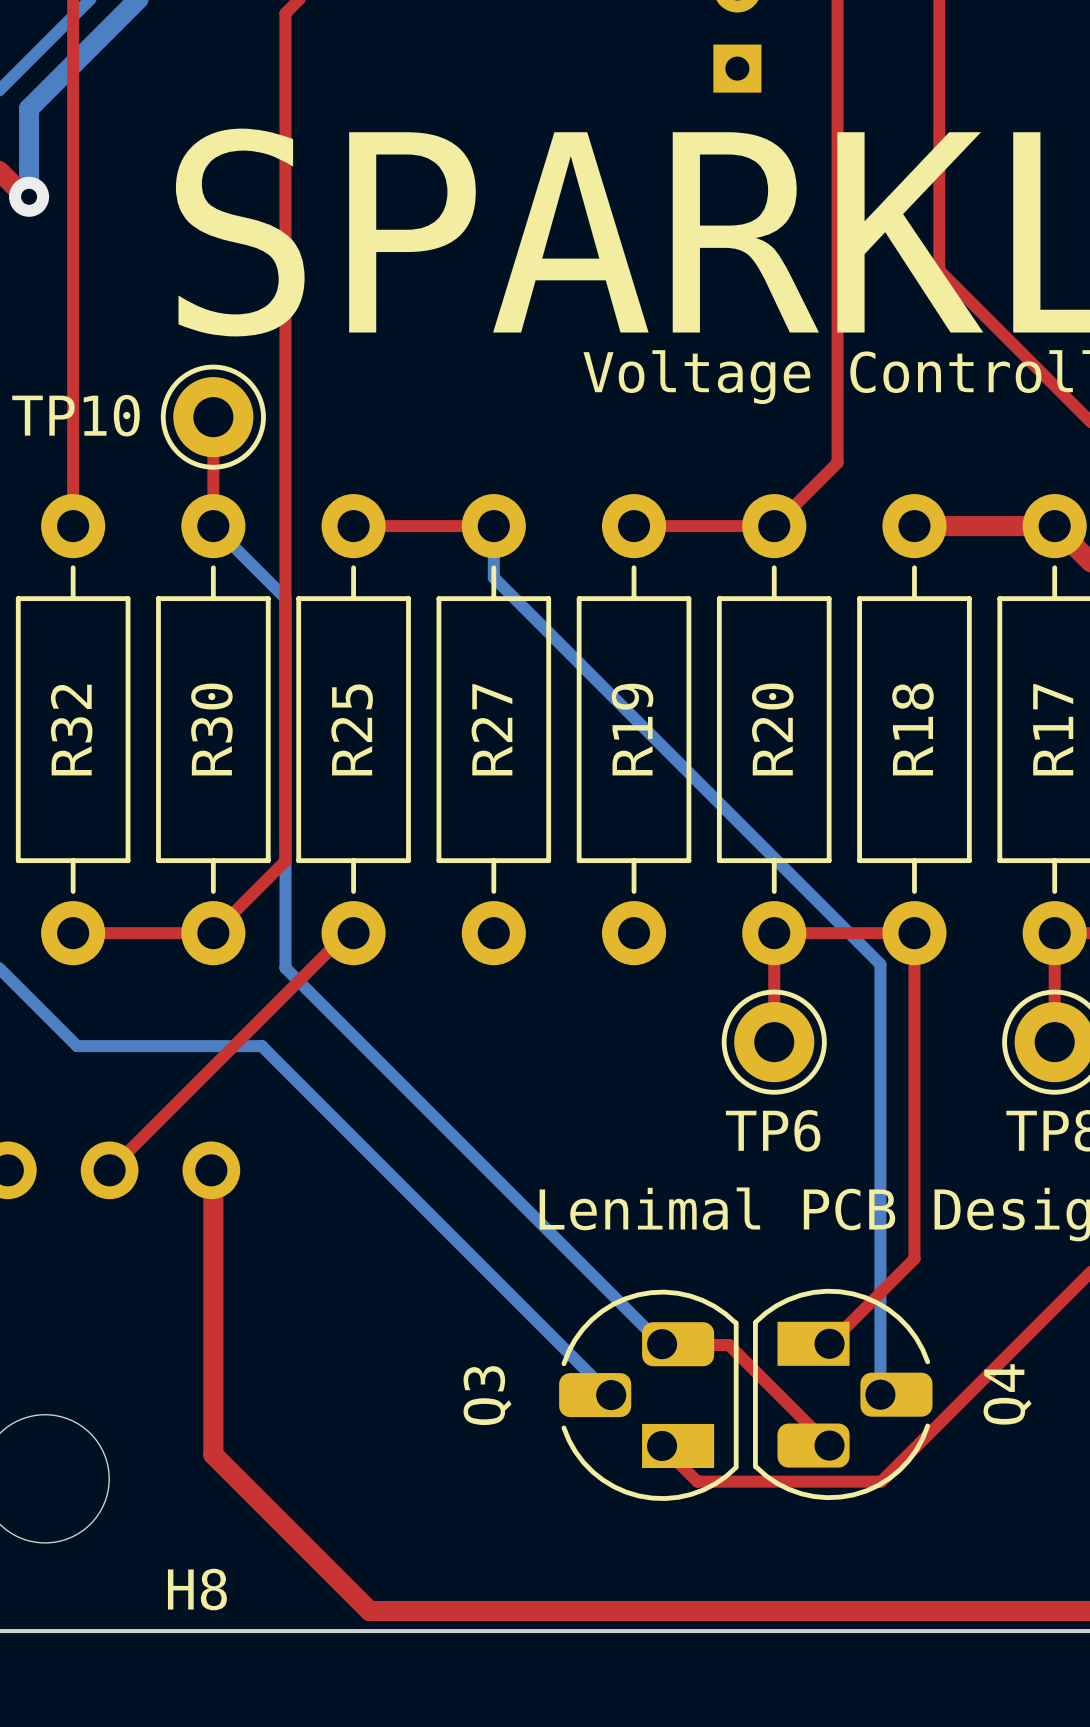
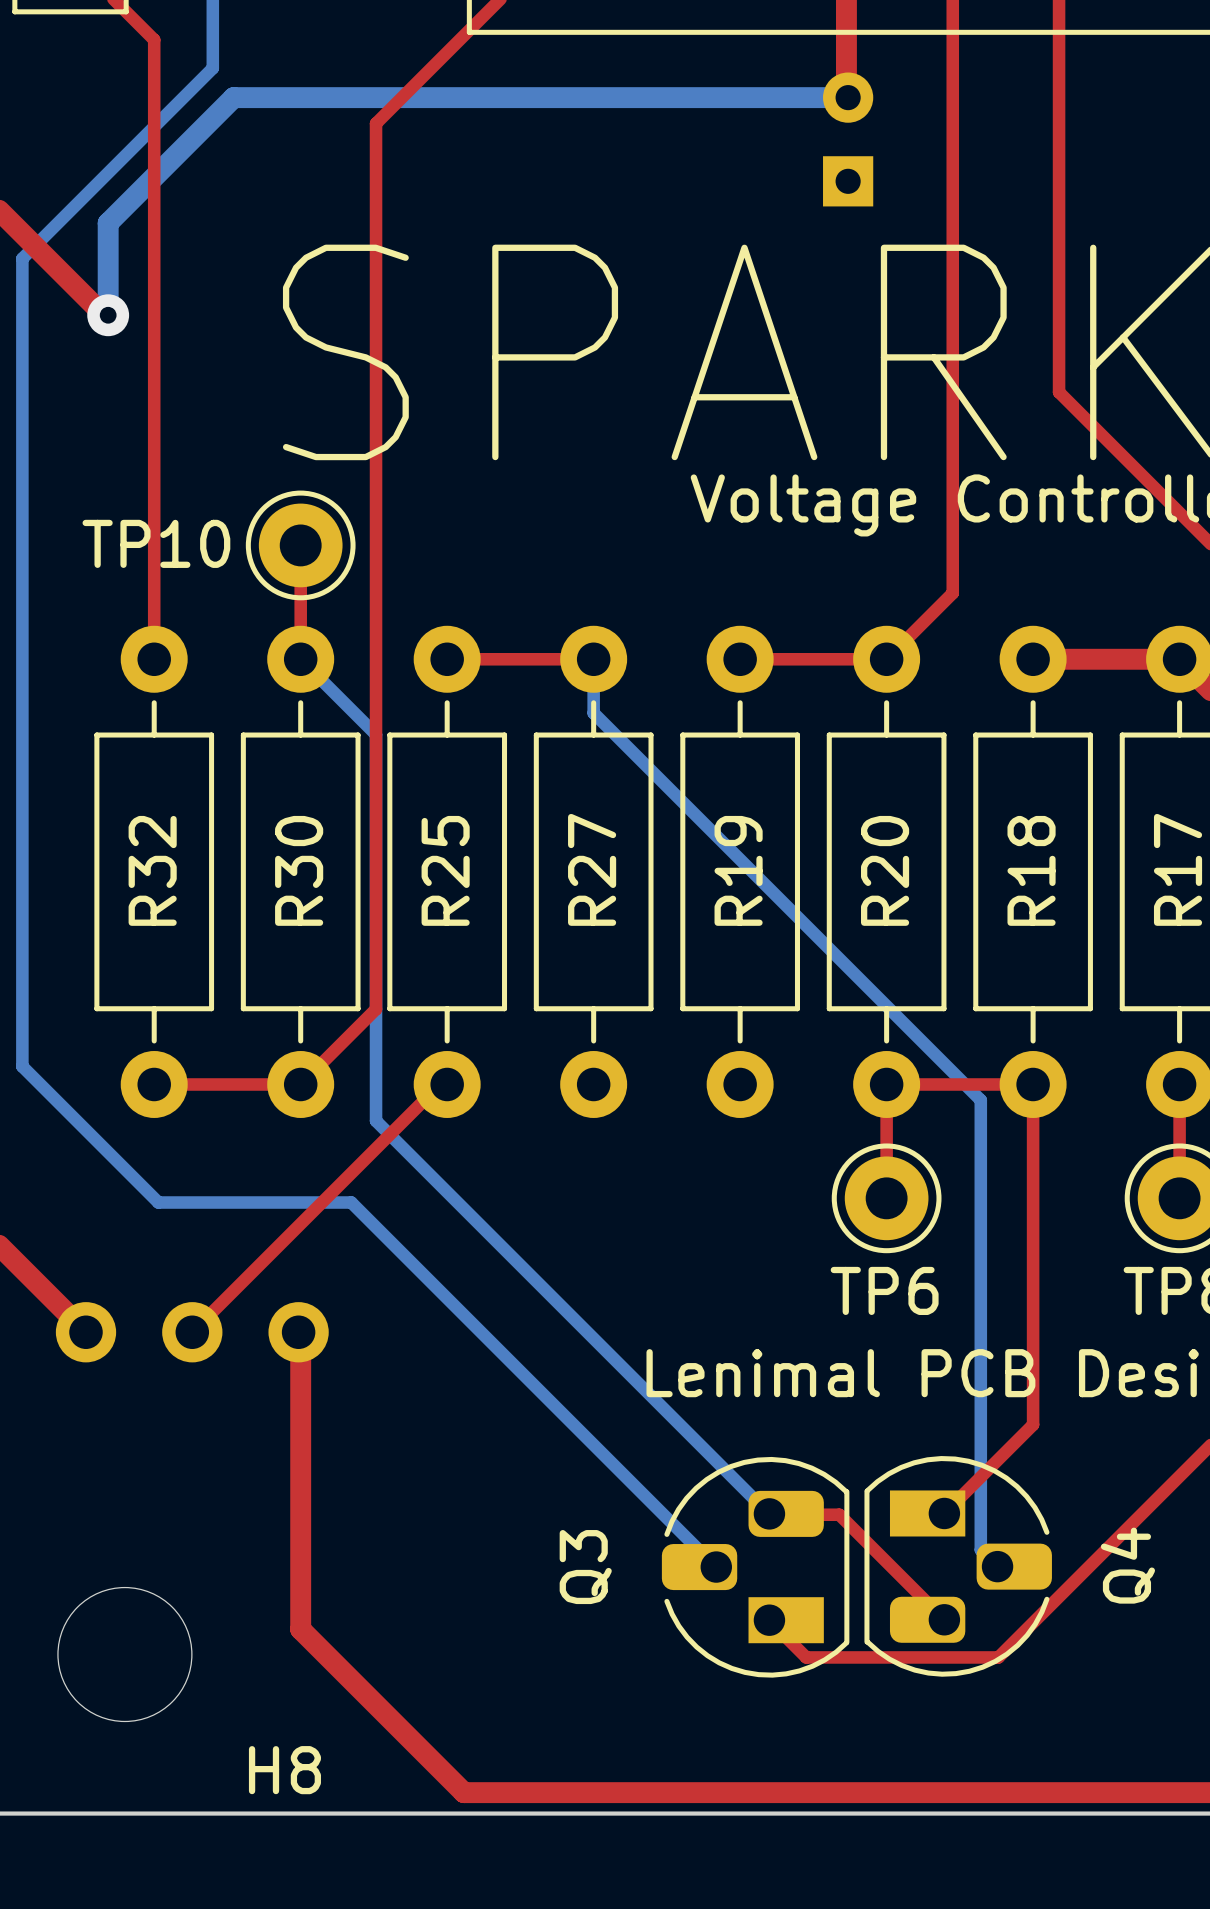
bottom track: (864, 948) (880, 964) (880, 1394) -> (980, 1100) (980, 1549) (997, 1566)

